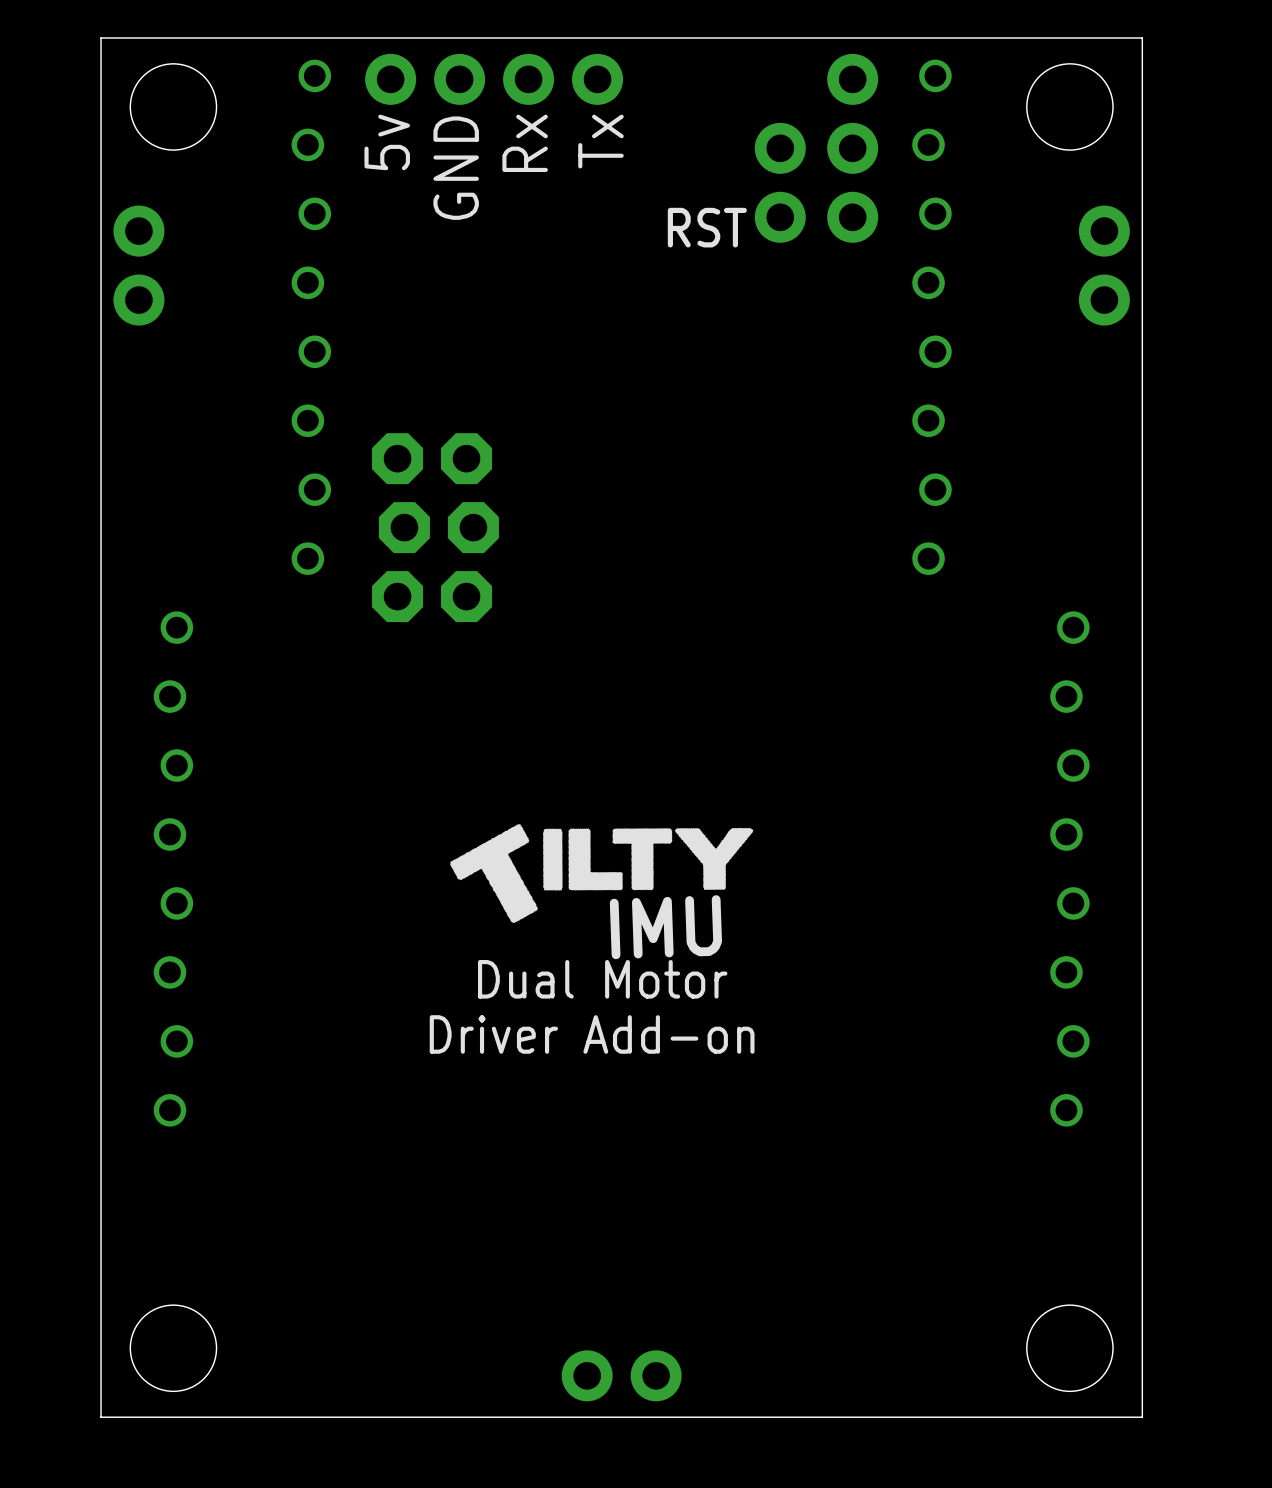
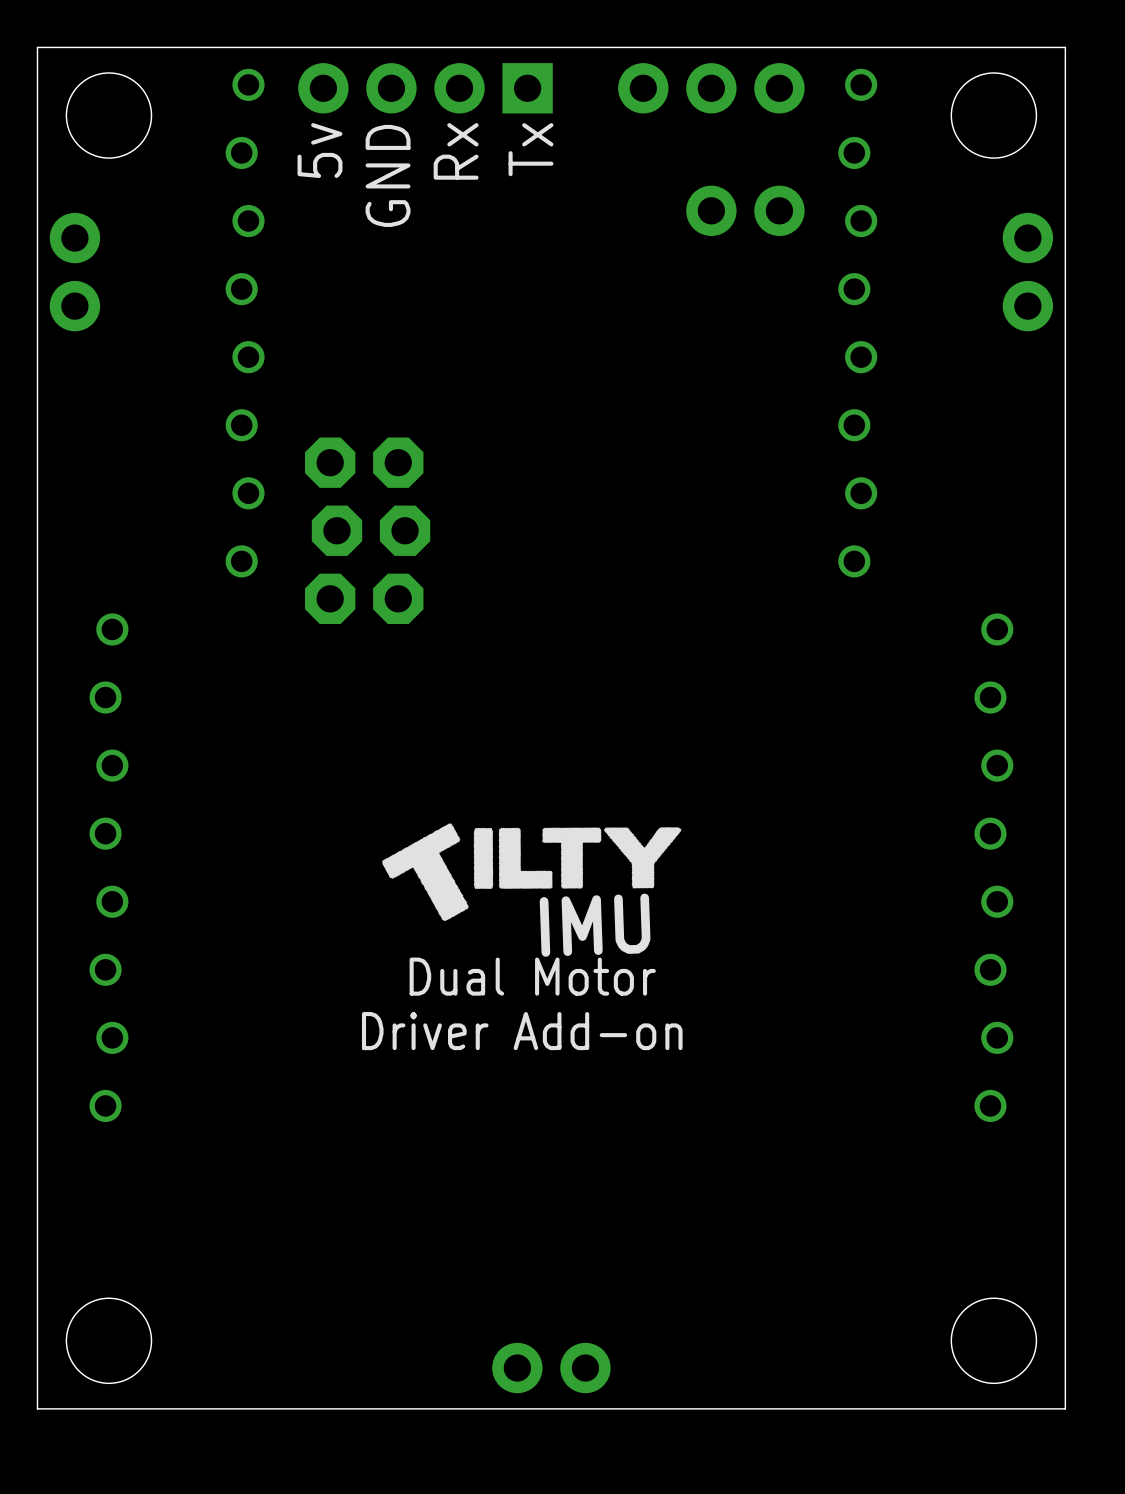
part footprint: [365, 53, 624, 105] -> [298, 63, 553, 114]
part rotation: 0° (852, 148) -> 90° clockwise (711, 88)
part rotation: 0° (780, 182) -> 90° clockwise (745, 210)
text: RST (707, 227) -> none

